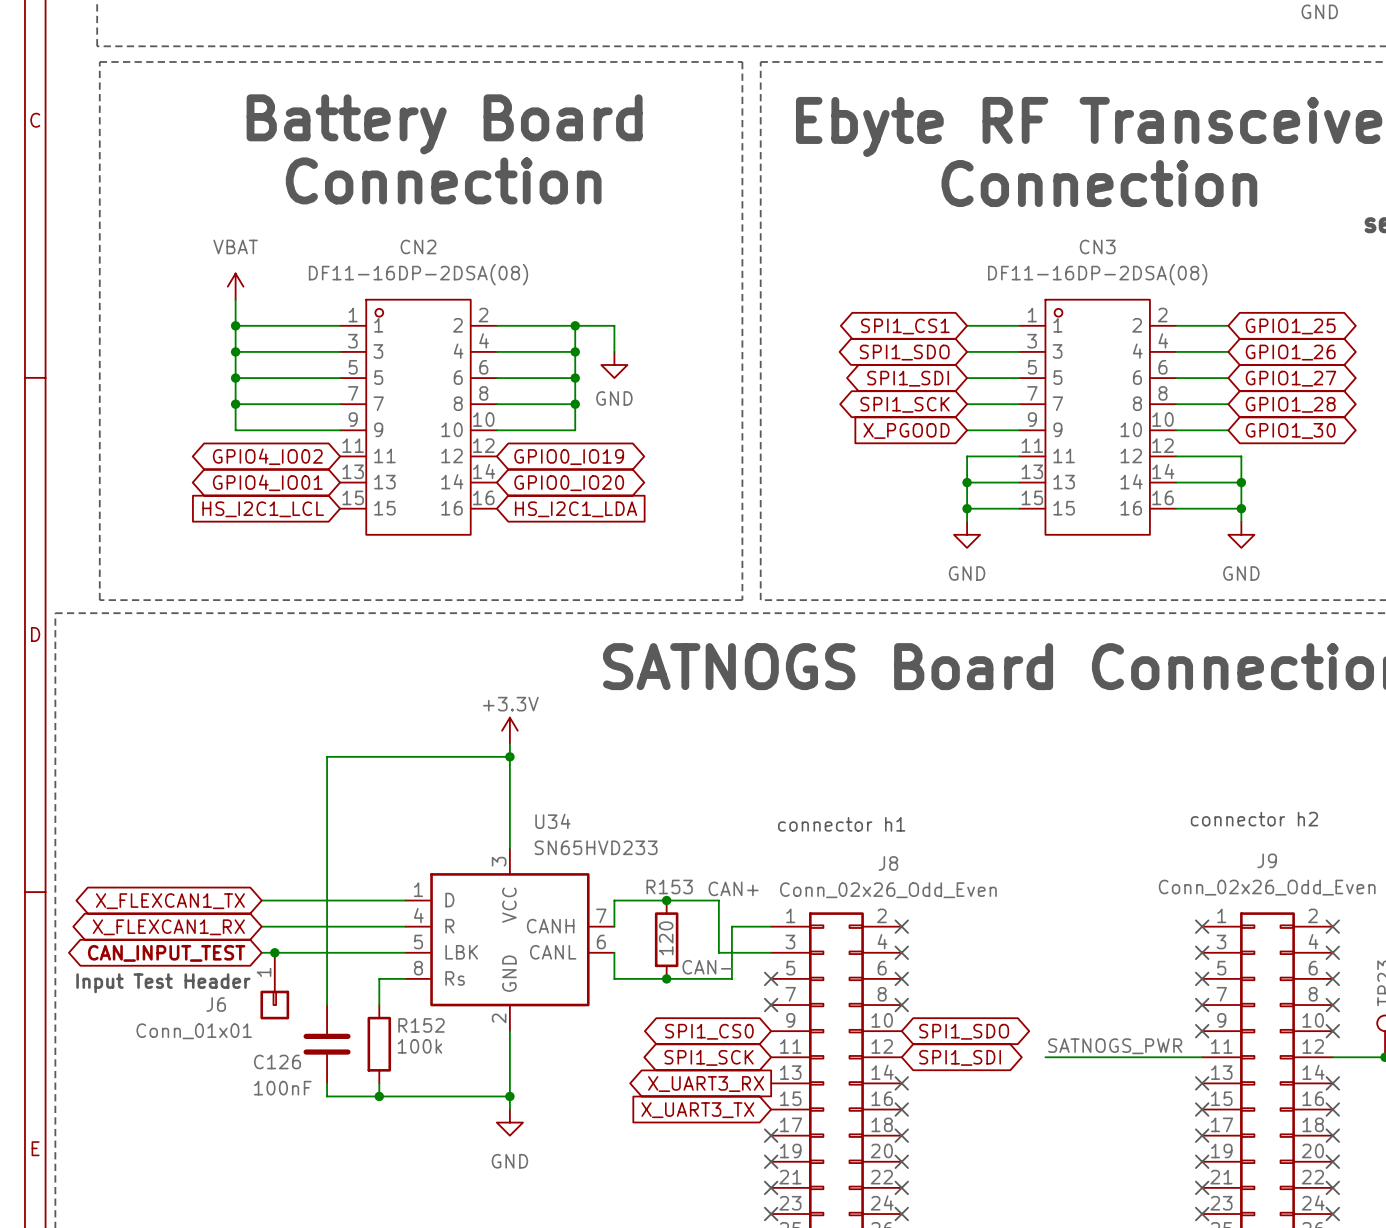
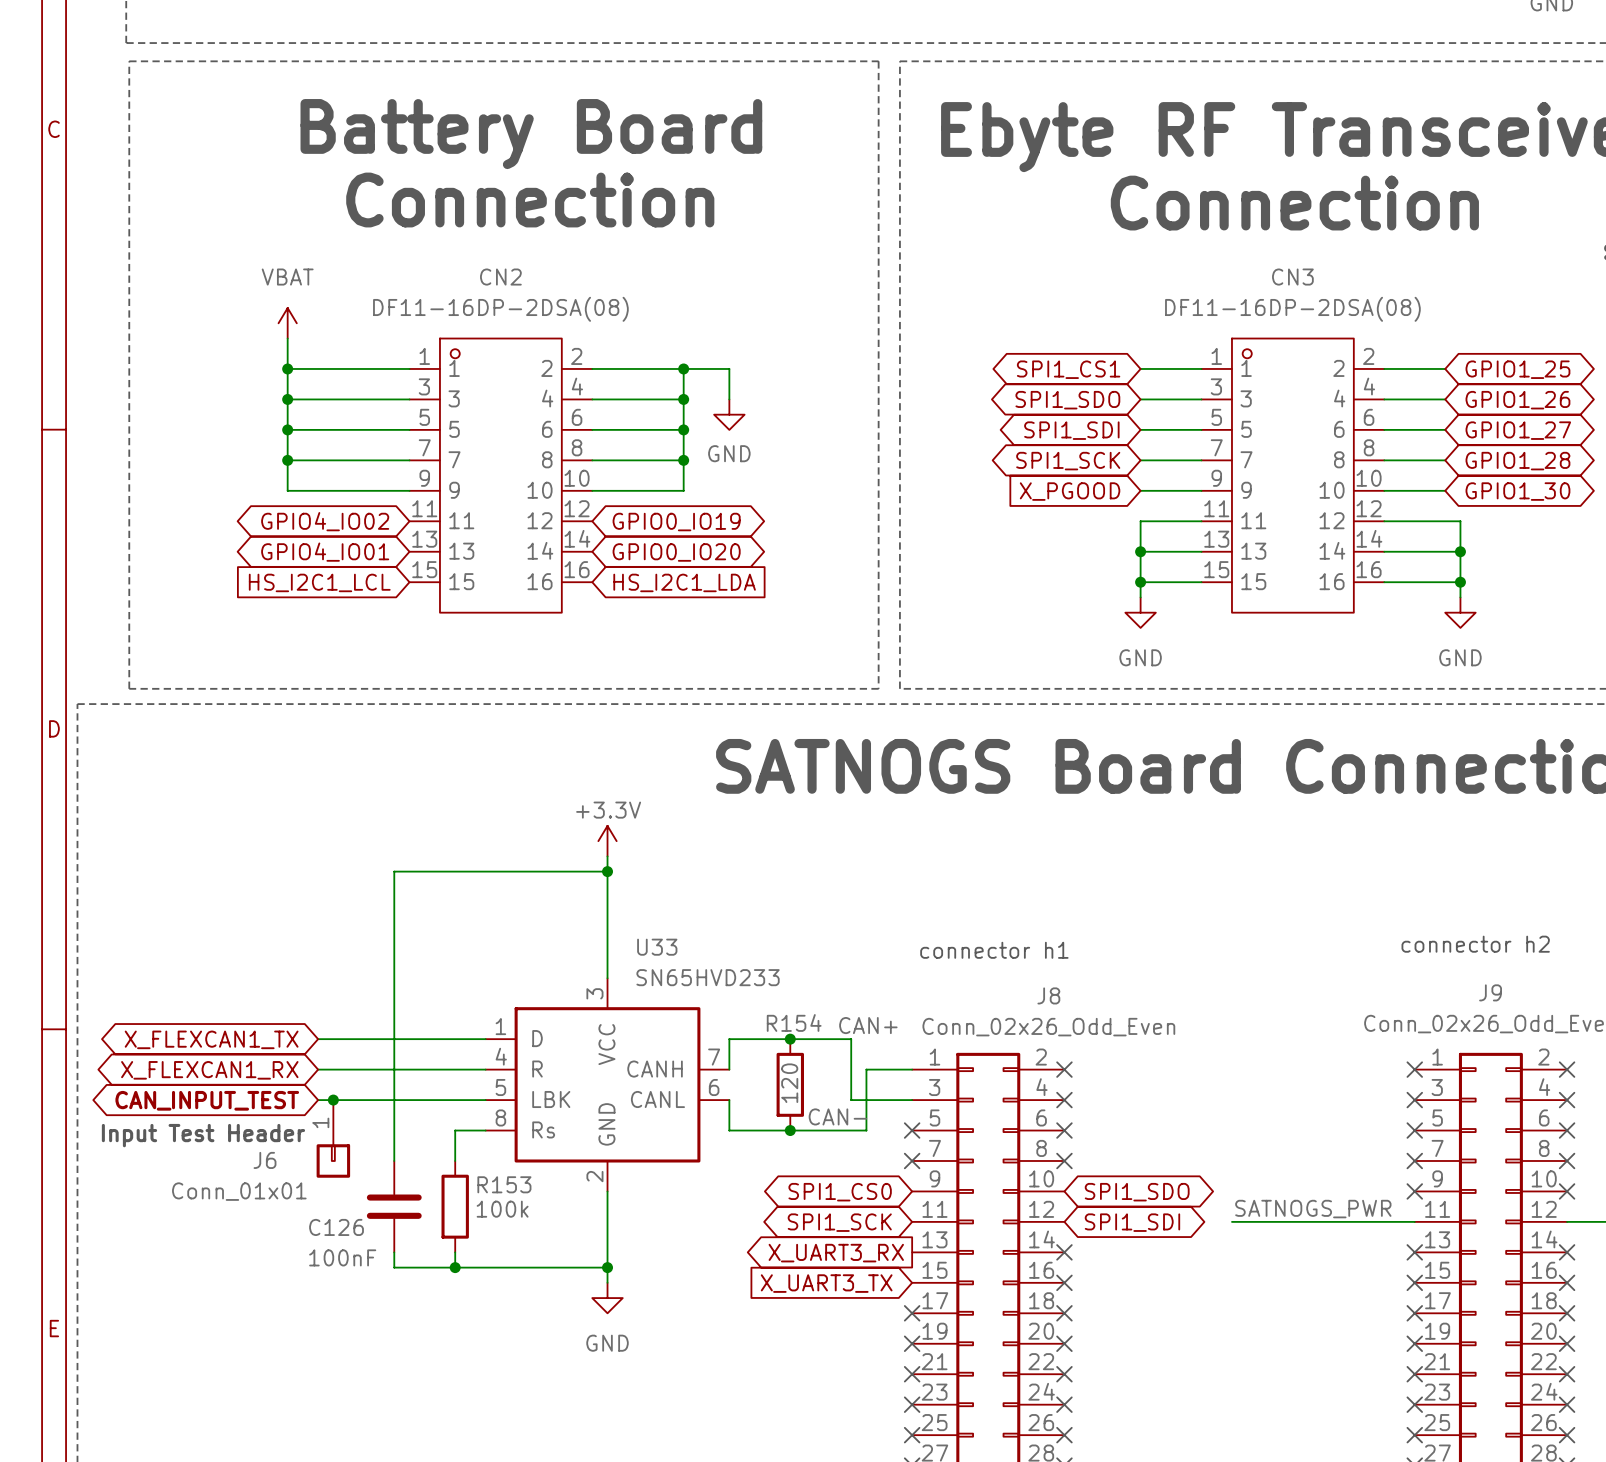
U34 name: U34 (552, 821) -> U33 (657, 947)
R153 name: R153 (669, 886) -> R154 (794, 1022)
R152 name: R152 (421, 1025) -> R153 (504, 1184)

